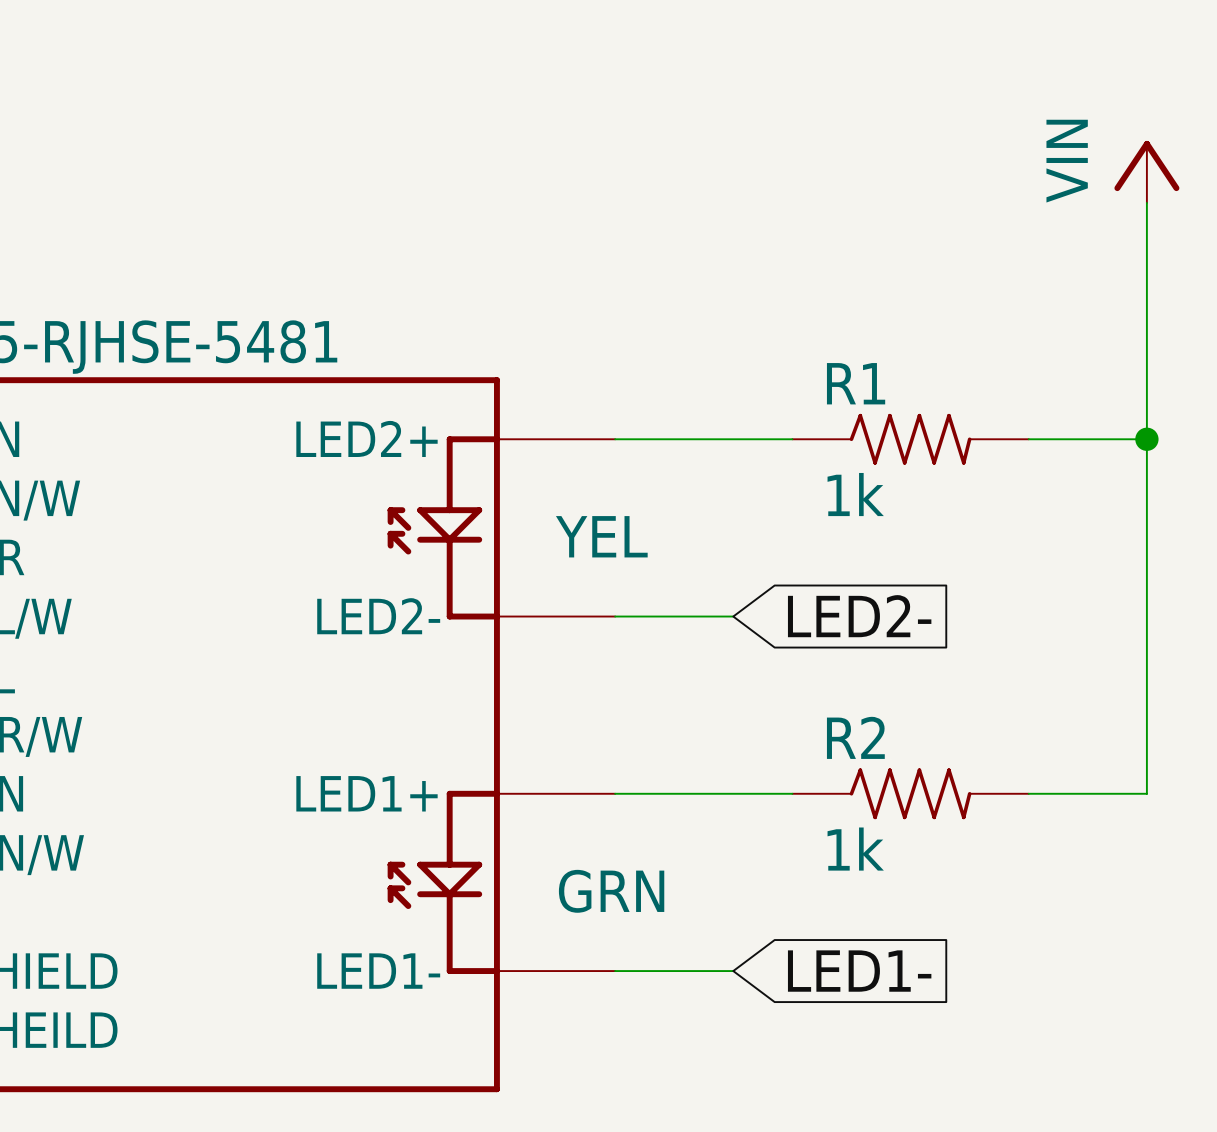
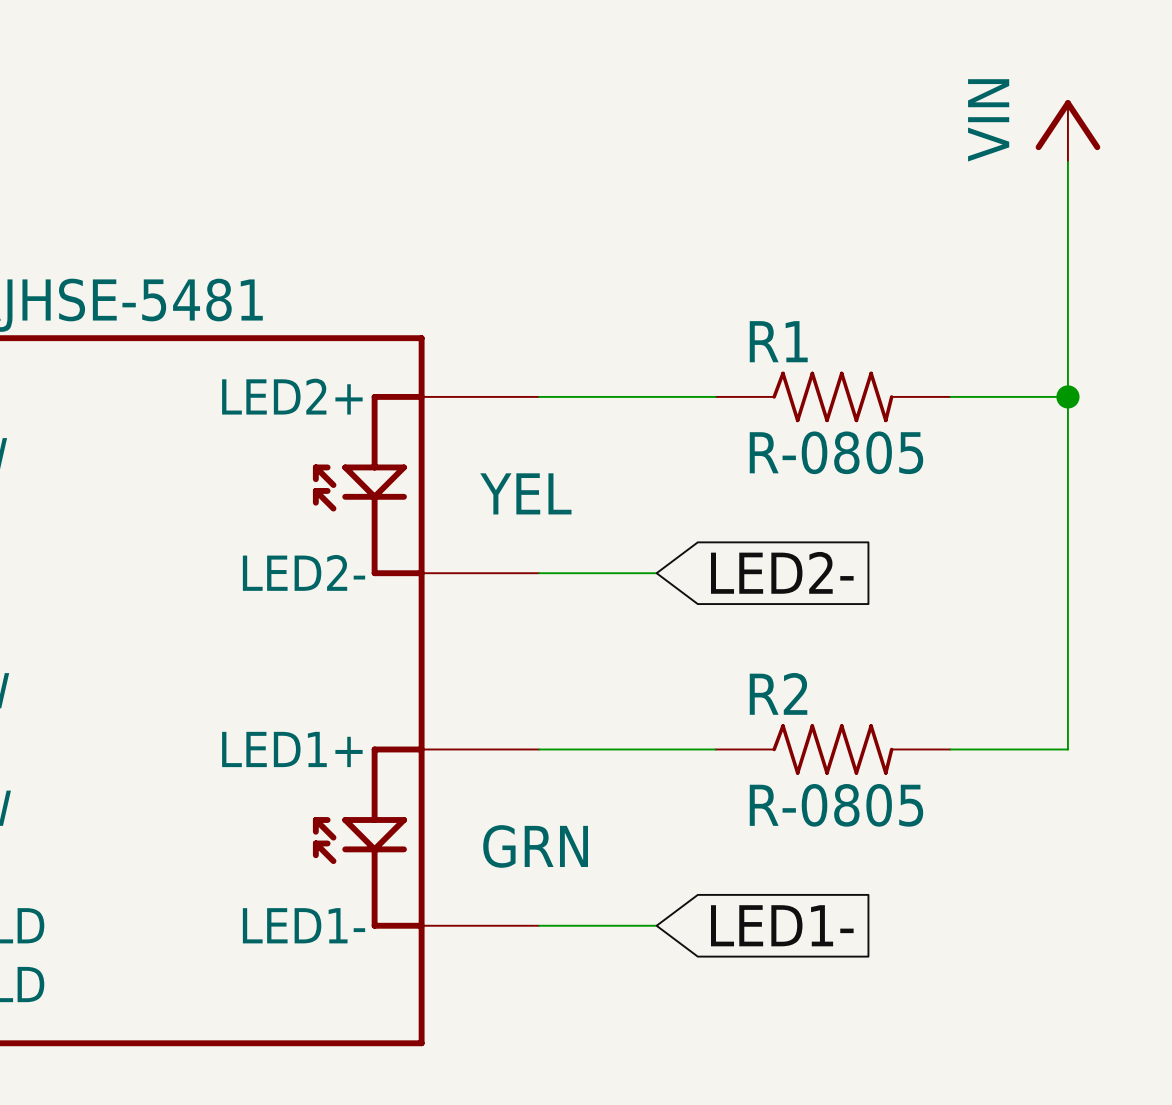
R1 value: 1k (855, 494) -> R-0805 (836, 452)
R2 value: 1k (855, 849) -> R-0805 (836, 805)

